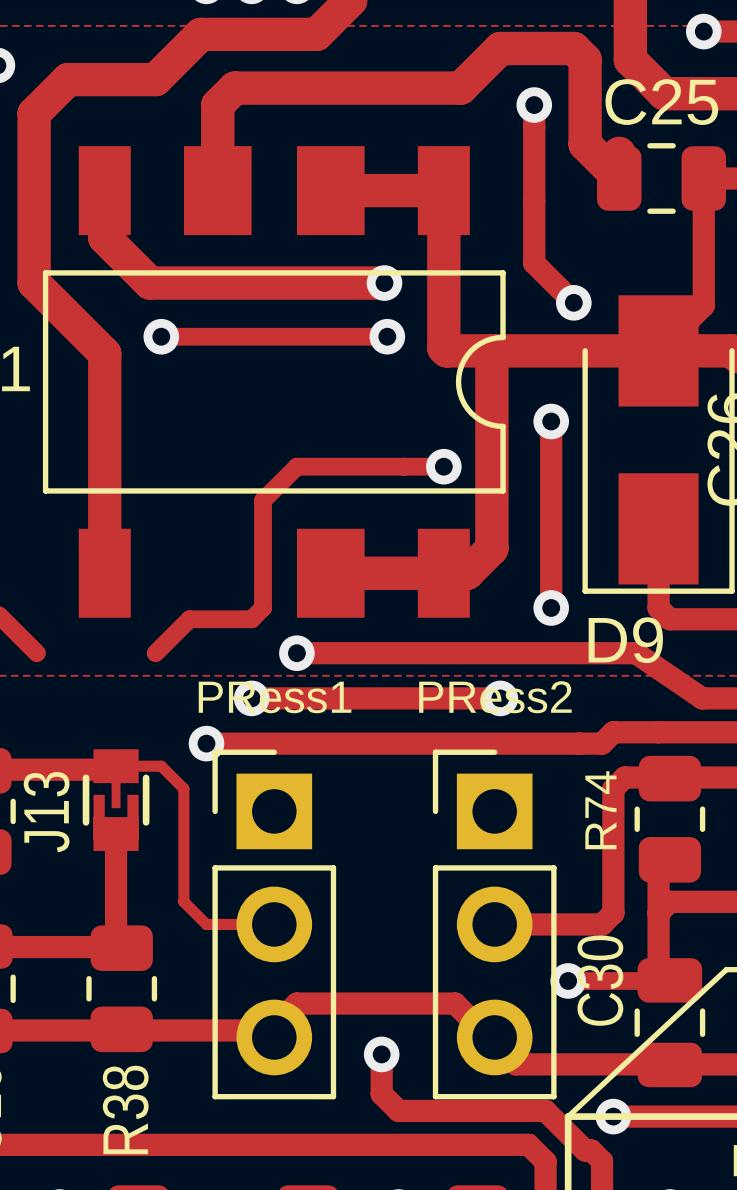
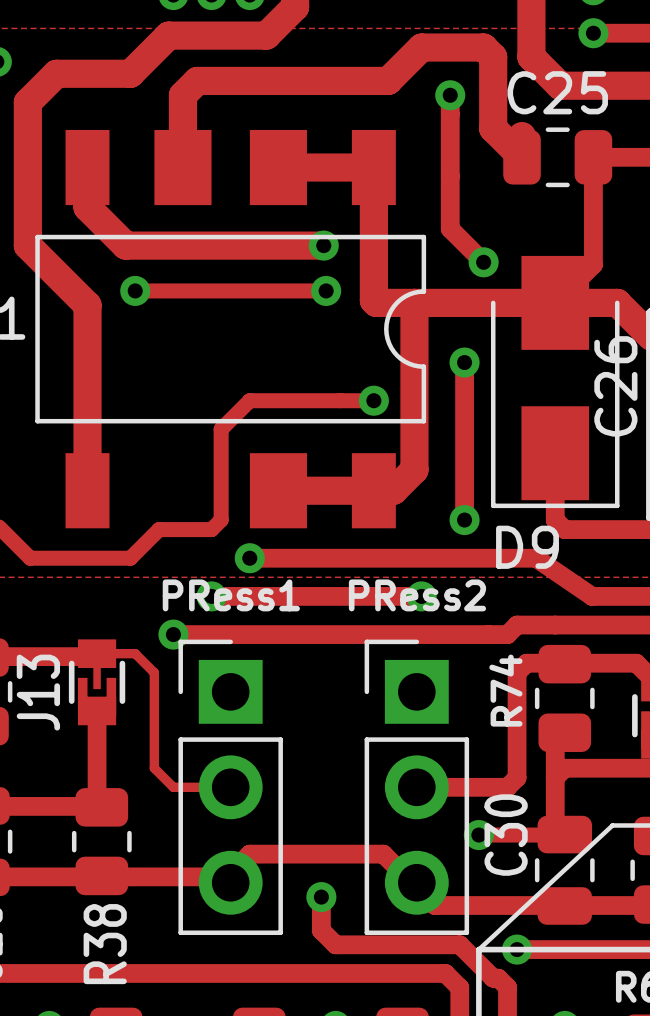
track: none -> (30, 558) (130, 558)

